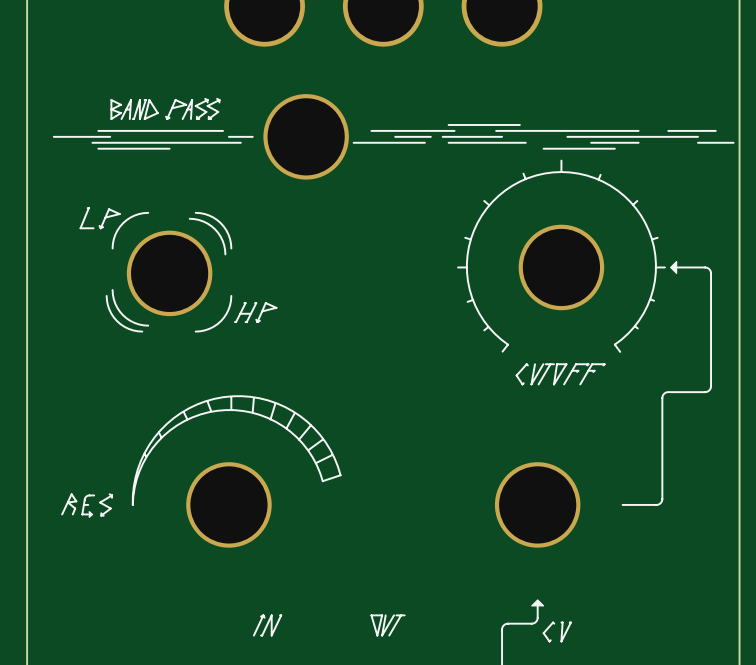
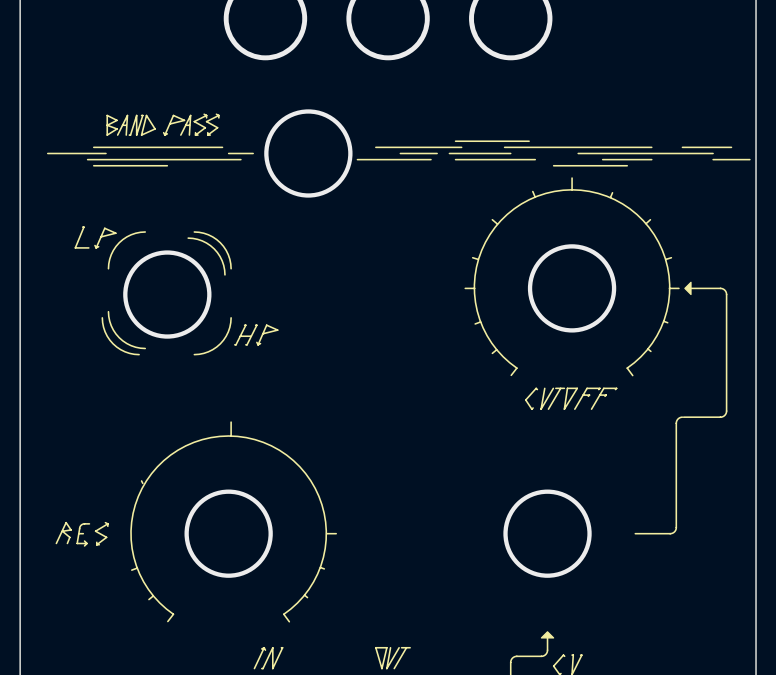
line: (253, 398) (252, 412) -> none
line: (207, 401) (211, 411) -> none
line: (275, 404) (270, 419) -> none
line: (183, 412) (187, 419) -> none
line: (294, 412) (286, 428) -> none
line: (310, 425) (299, 439) -> none
line: (158, 432) (161, 437) -> none
line: (322, 439) (308, 450) -> none
line: (332, 455) (316, 463) -> none
line: (340, 475) (322, 481) (312, 457) (302, 443) (290, 431) (275, 421) (251, 412) (234, 410) (217, 410) (200, 414) (184, 421) (170, 430) (157, 442) (147, 455) (139, 471) (134, 487) (132, 504) (133, 486) (137, 469) (144, 452) (154, 437) (166, 423) (181, 412) (197, 404) (223, 397) (241, 396) (259, 398) (276, 403) (293, 411) (307, 422) (320, 435) (330, 450) (340, 475) -> none
line: none -> (326, 533) (336, 533)
line: none -> (320, 567) (324, 568)
line: none -> (137, 568) (131, 570)
line: none -> (304, 595) (307, 597)
line: none -> (153, 596) (148, 599)
line: none -> (167, 621) (173, 614) (159, 603) (148, 589) (139, 574) (133, 557) (131, 530) (135, 504) (146, 480) (157, 466) (170, 455) (193, 442) (211, 437) (228, 436) (254, 439) (271, 445) (286, 455) (305, 473) (315, 488) (321, 504) (326, 530) (323, 557) (317, 574) (308, 589) (297, 603) (283, 614) (289, 621)

